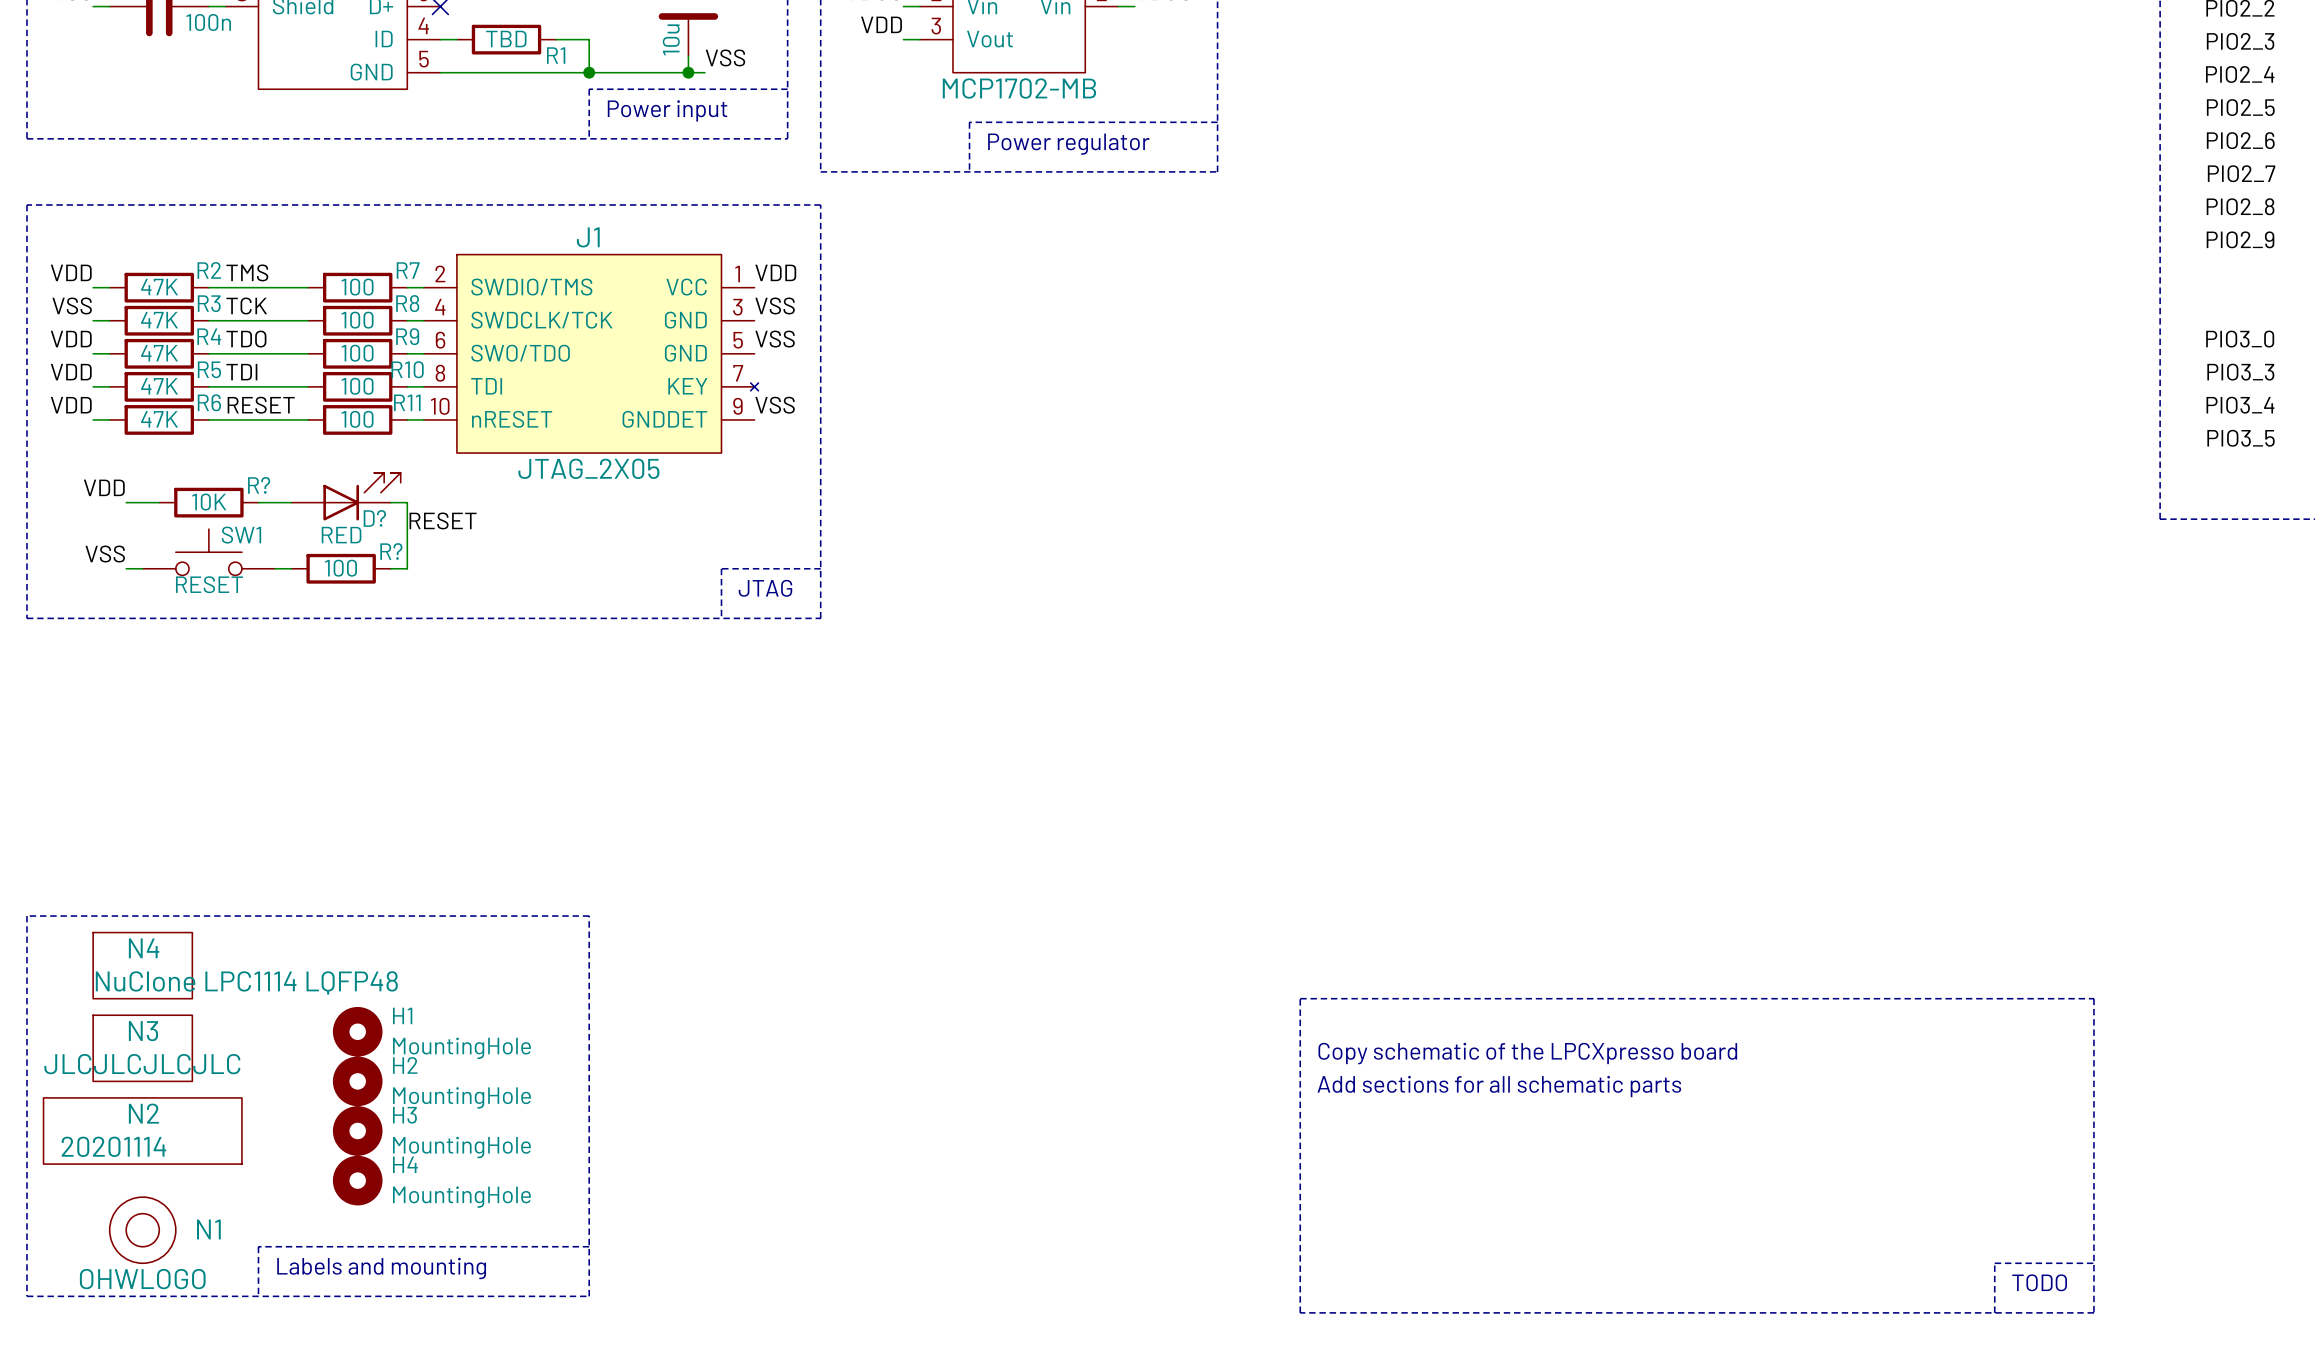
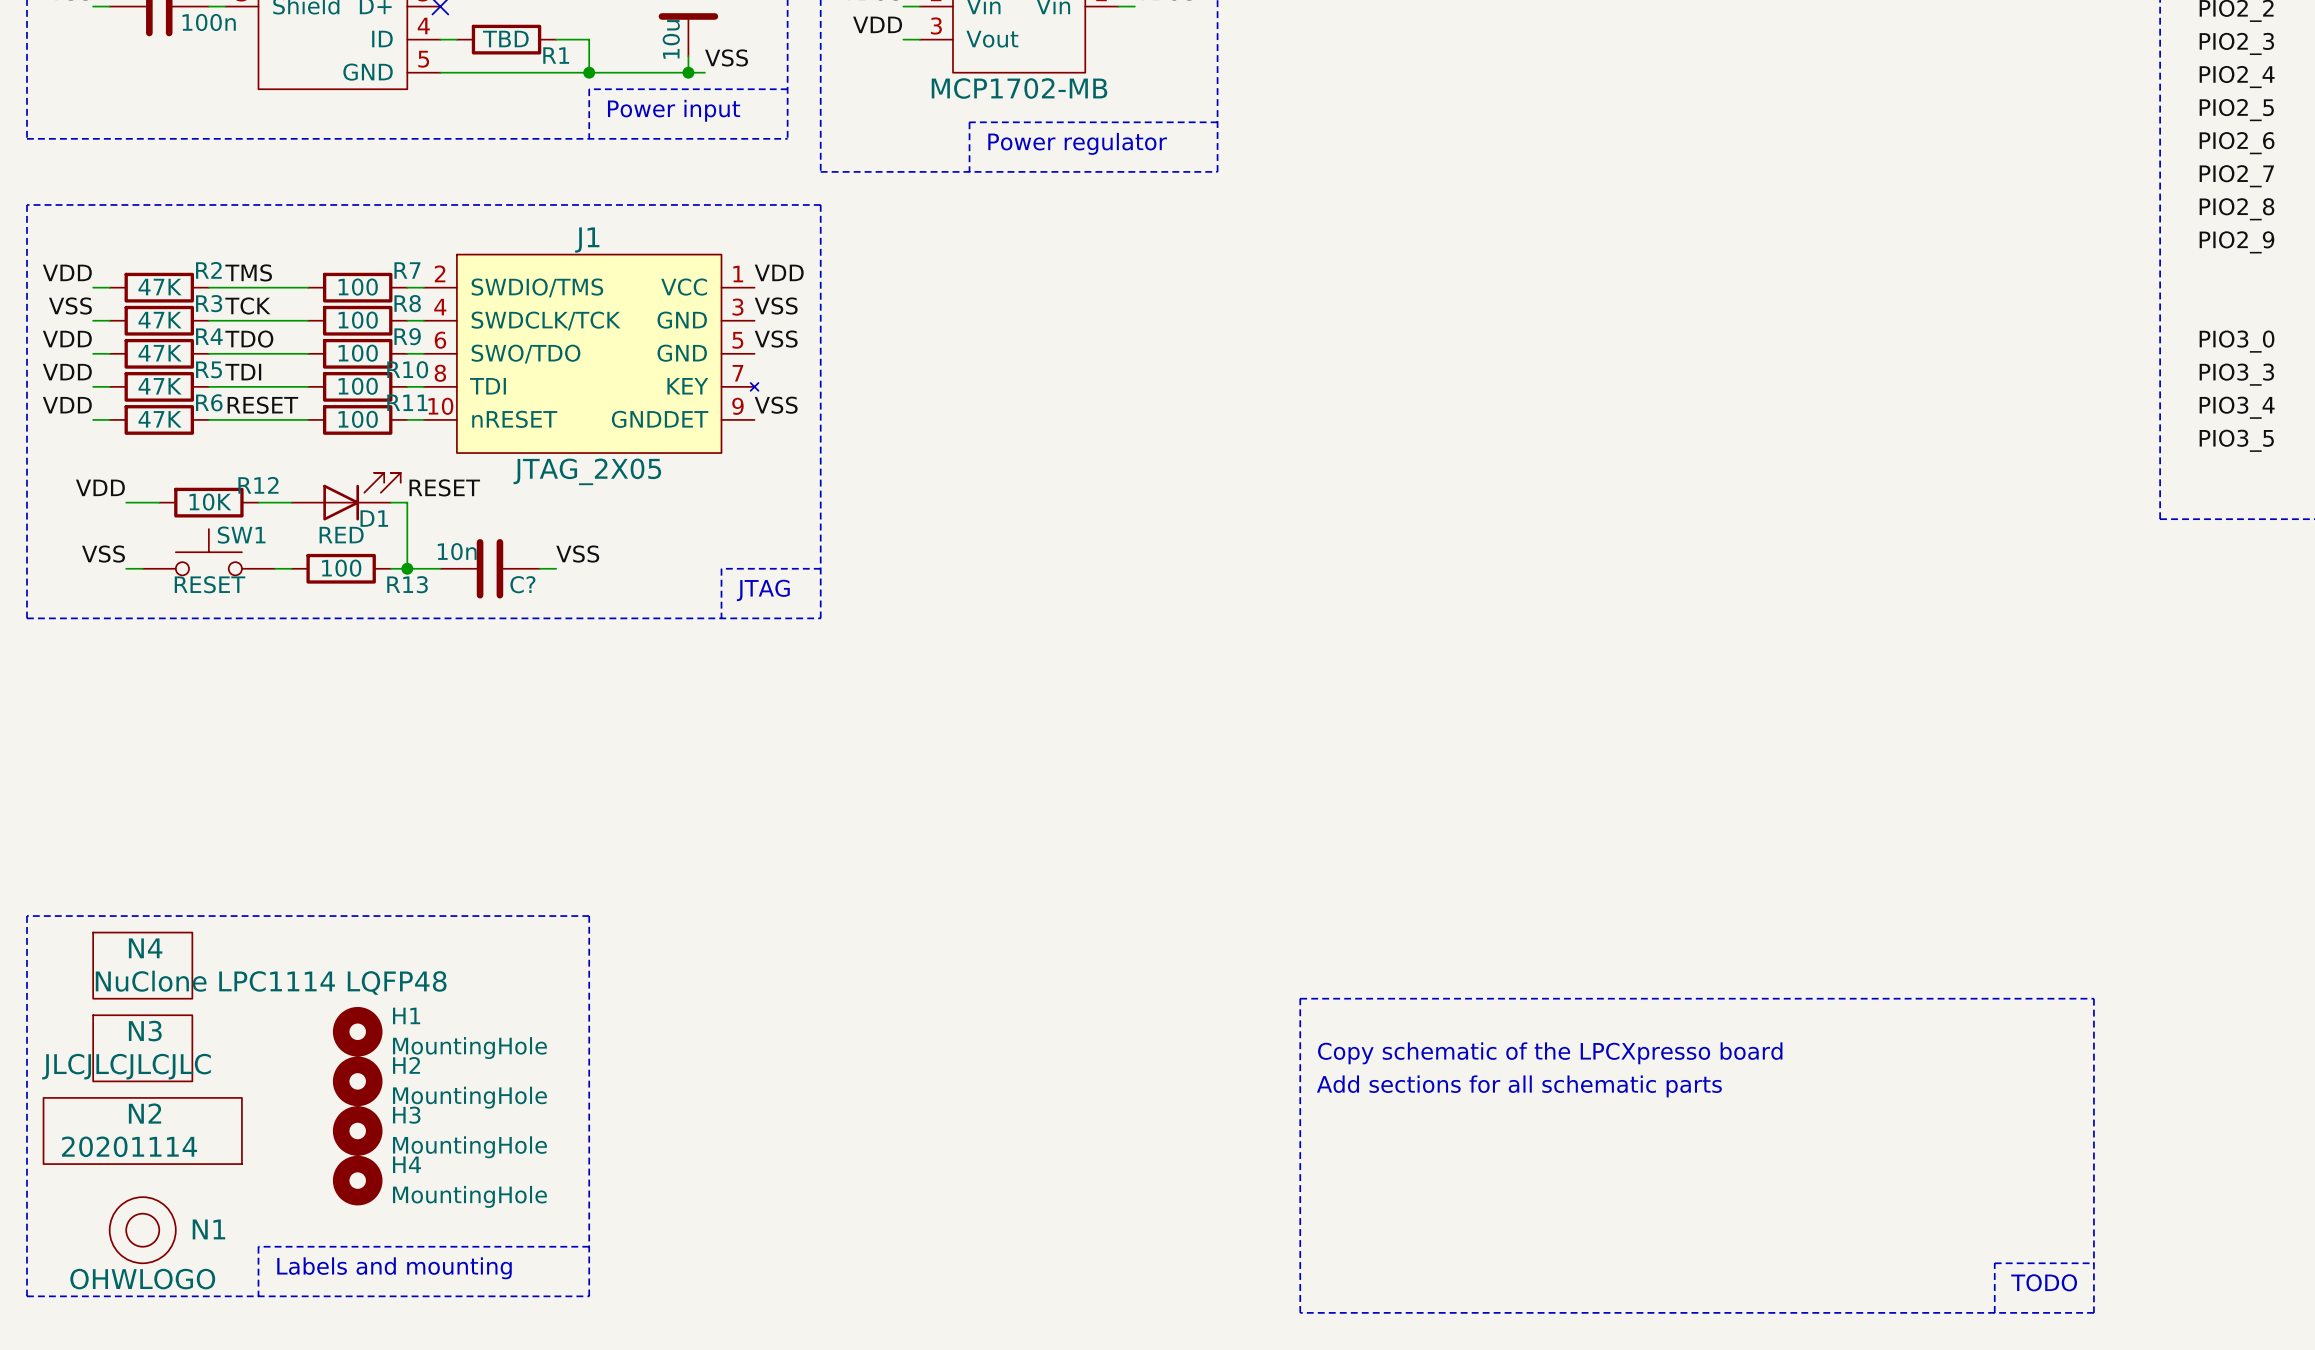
R? name: R? (259, 485) -> R12 (258, 485)
D? name: D? (374, 518) -> D1 (374, 518)
label position: RESET (443, 520) -> RESET (444, 487)
R? name: R? (391, 551) -> R13 (407, 584)
label: none -> VSS (577, 554)
wire: none -> (407, 568) (440, 568)
junction: none -> (407, 568)
C?: none -> 10n (489, 568)
wire: none -> (539, 568) (556, 568)

